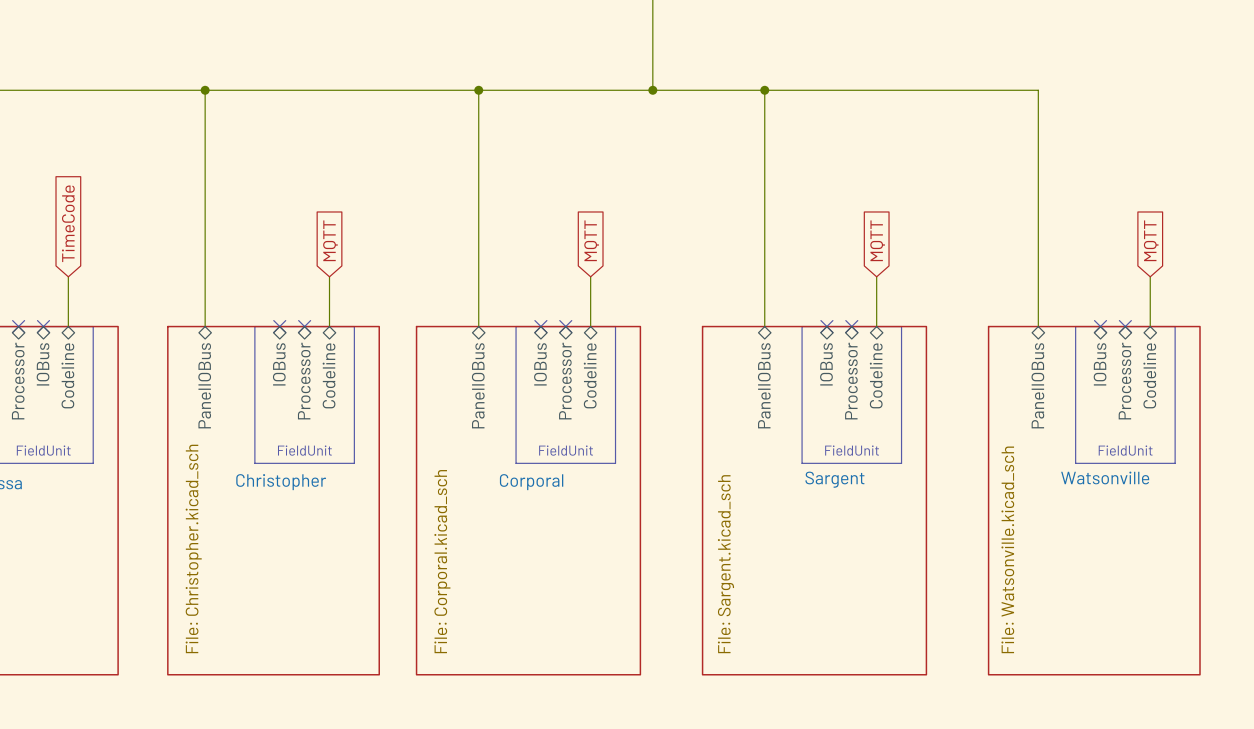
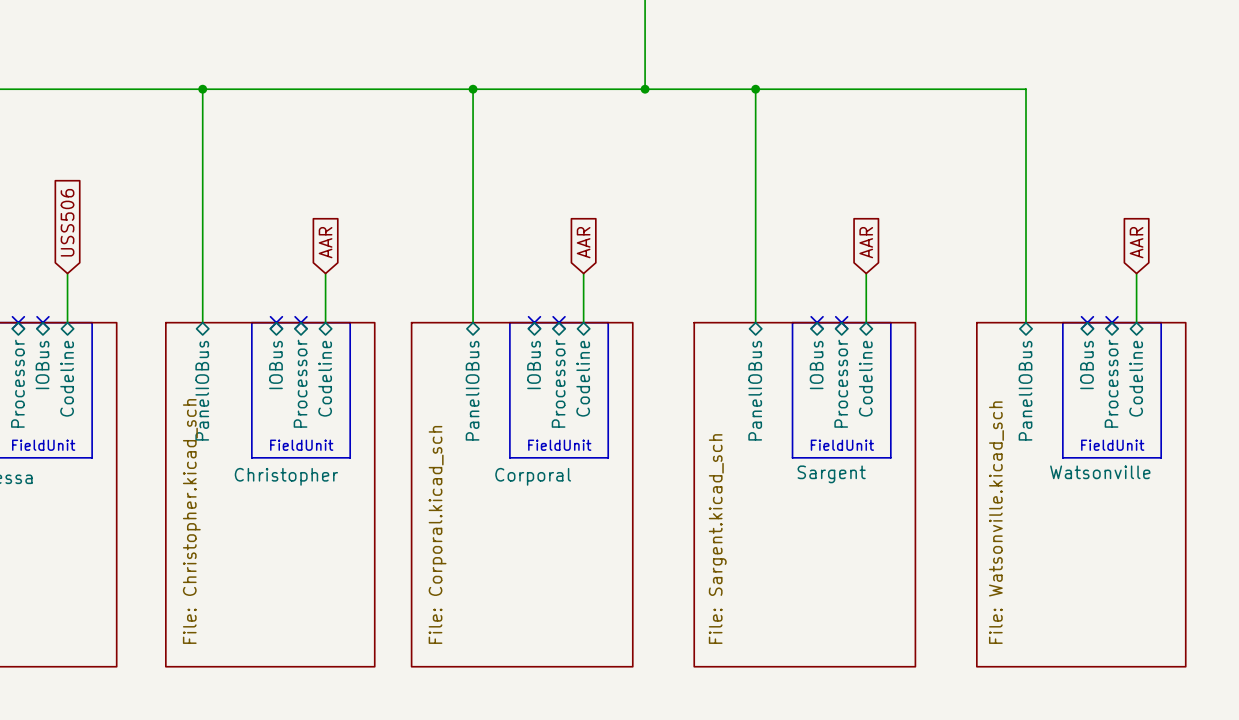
global label: TimeCode (68, 223) -> USS506 (67, 222)
global label: MQTT (330, 240) -> AAR (325, 242)
global label: MQTT (591, 240) -> AAR (583, 242)
global label: MQTT (877, 240) -> AAR (866, 242)
global label: MQTT (1151, 240) -> AAR (1136, 242)

